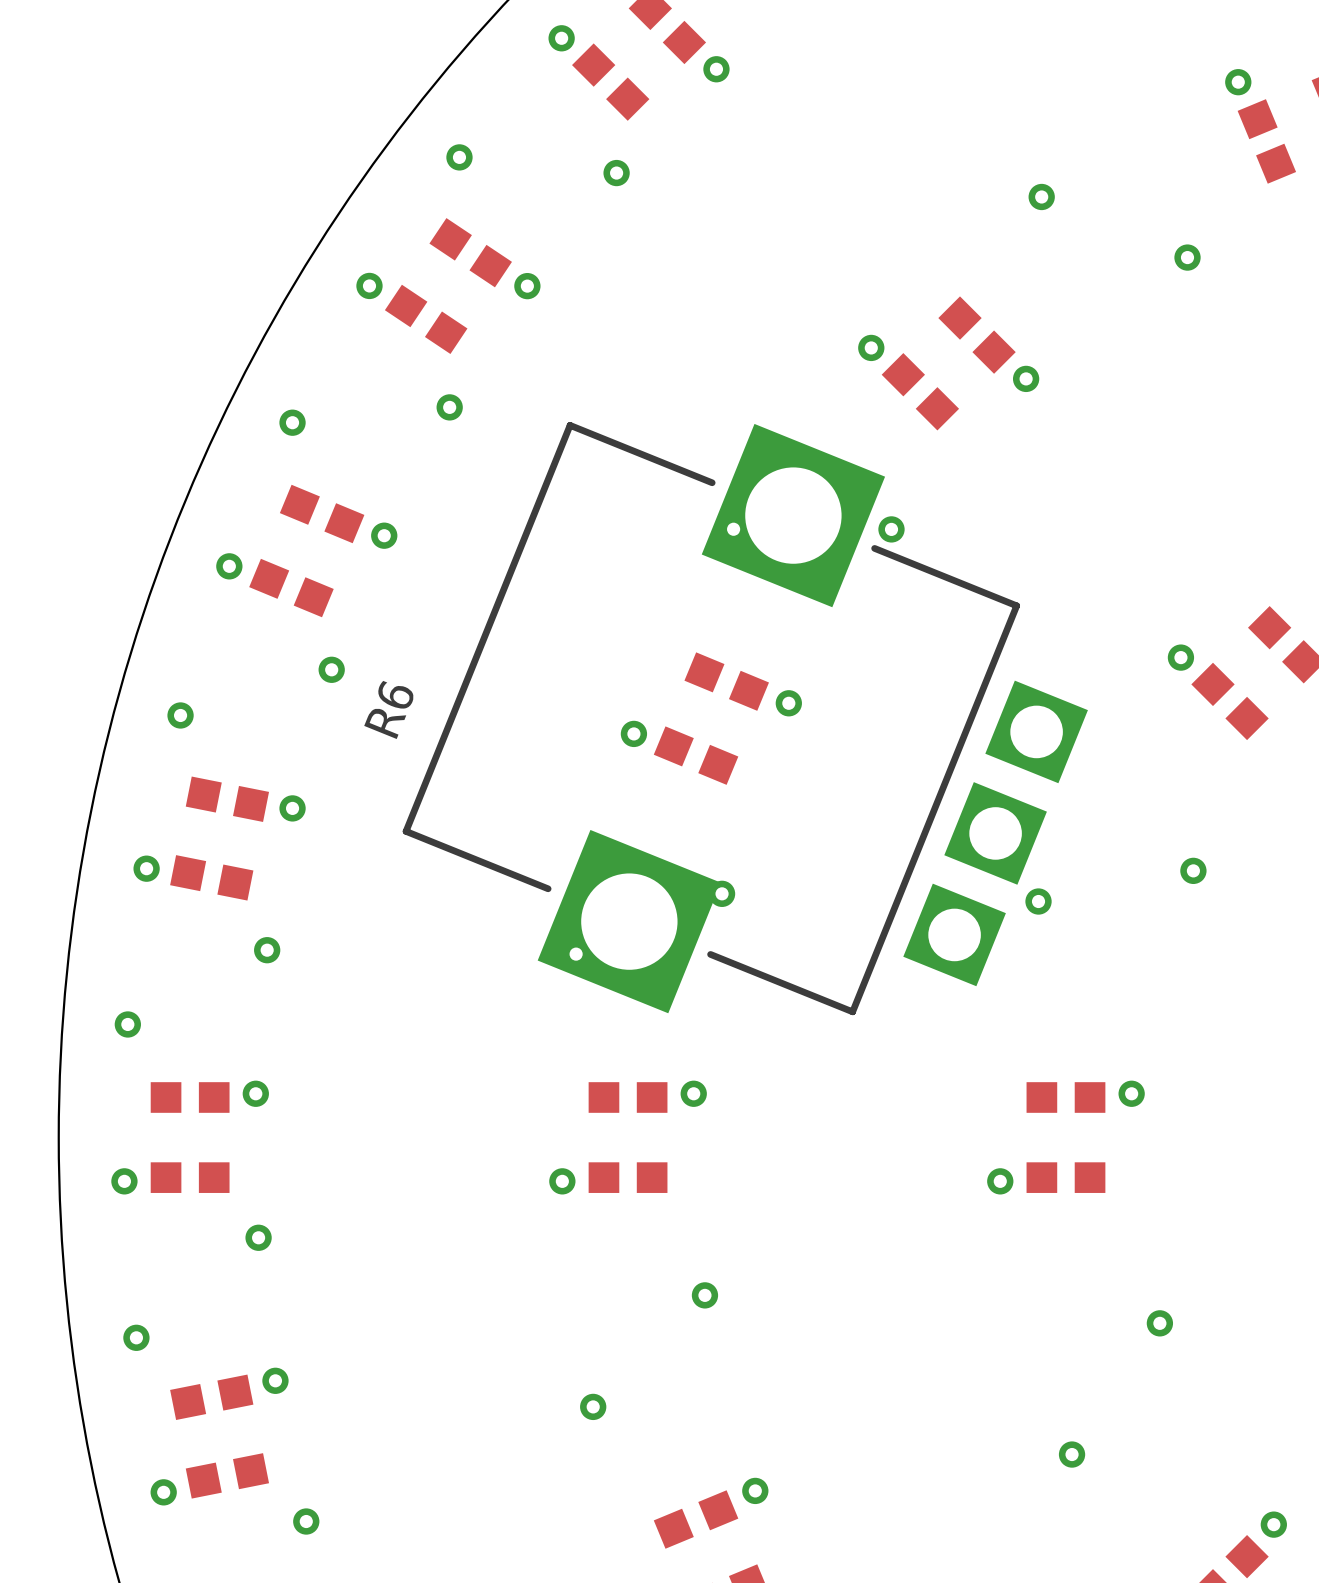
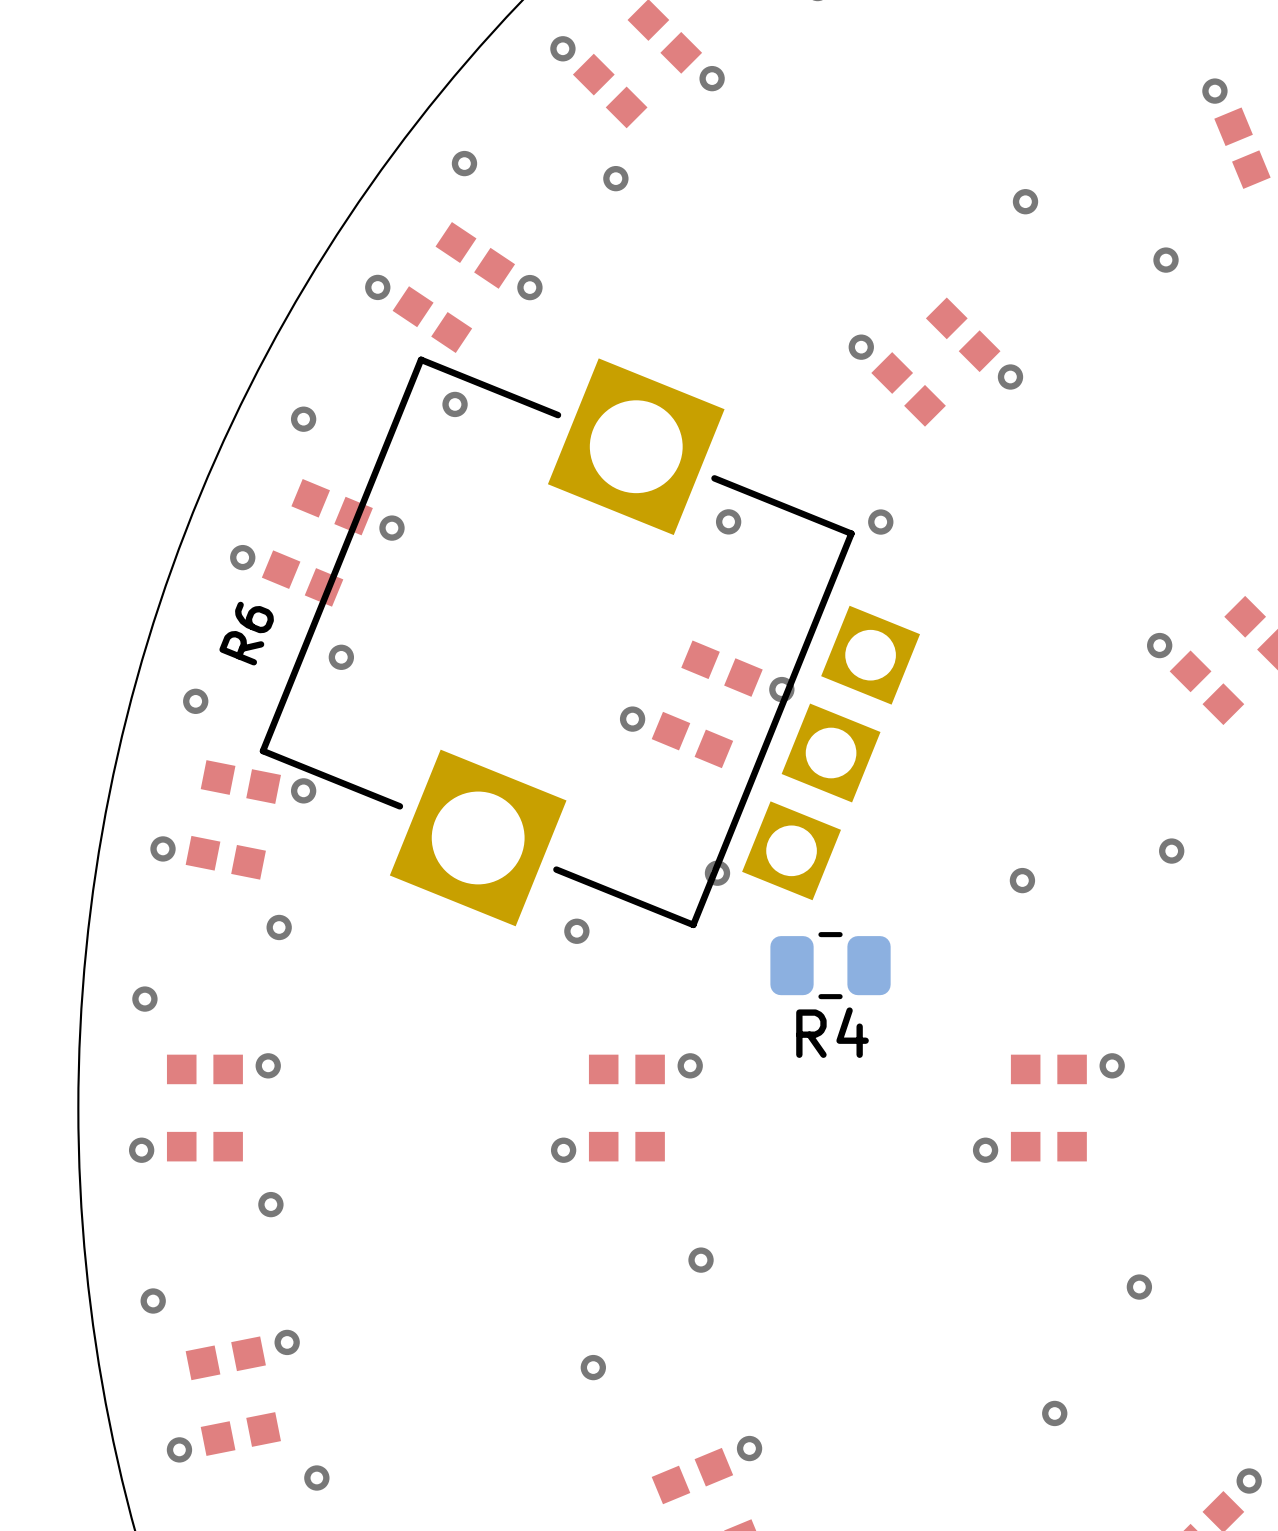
R6 position: (745, 718) -> (589, 642)
R4: none -> (830, 965)

